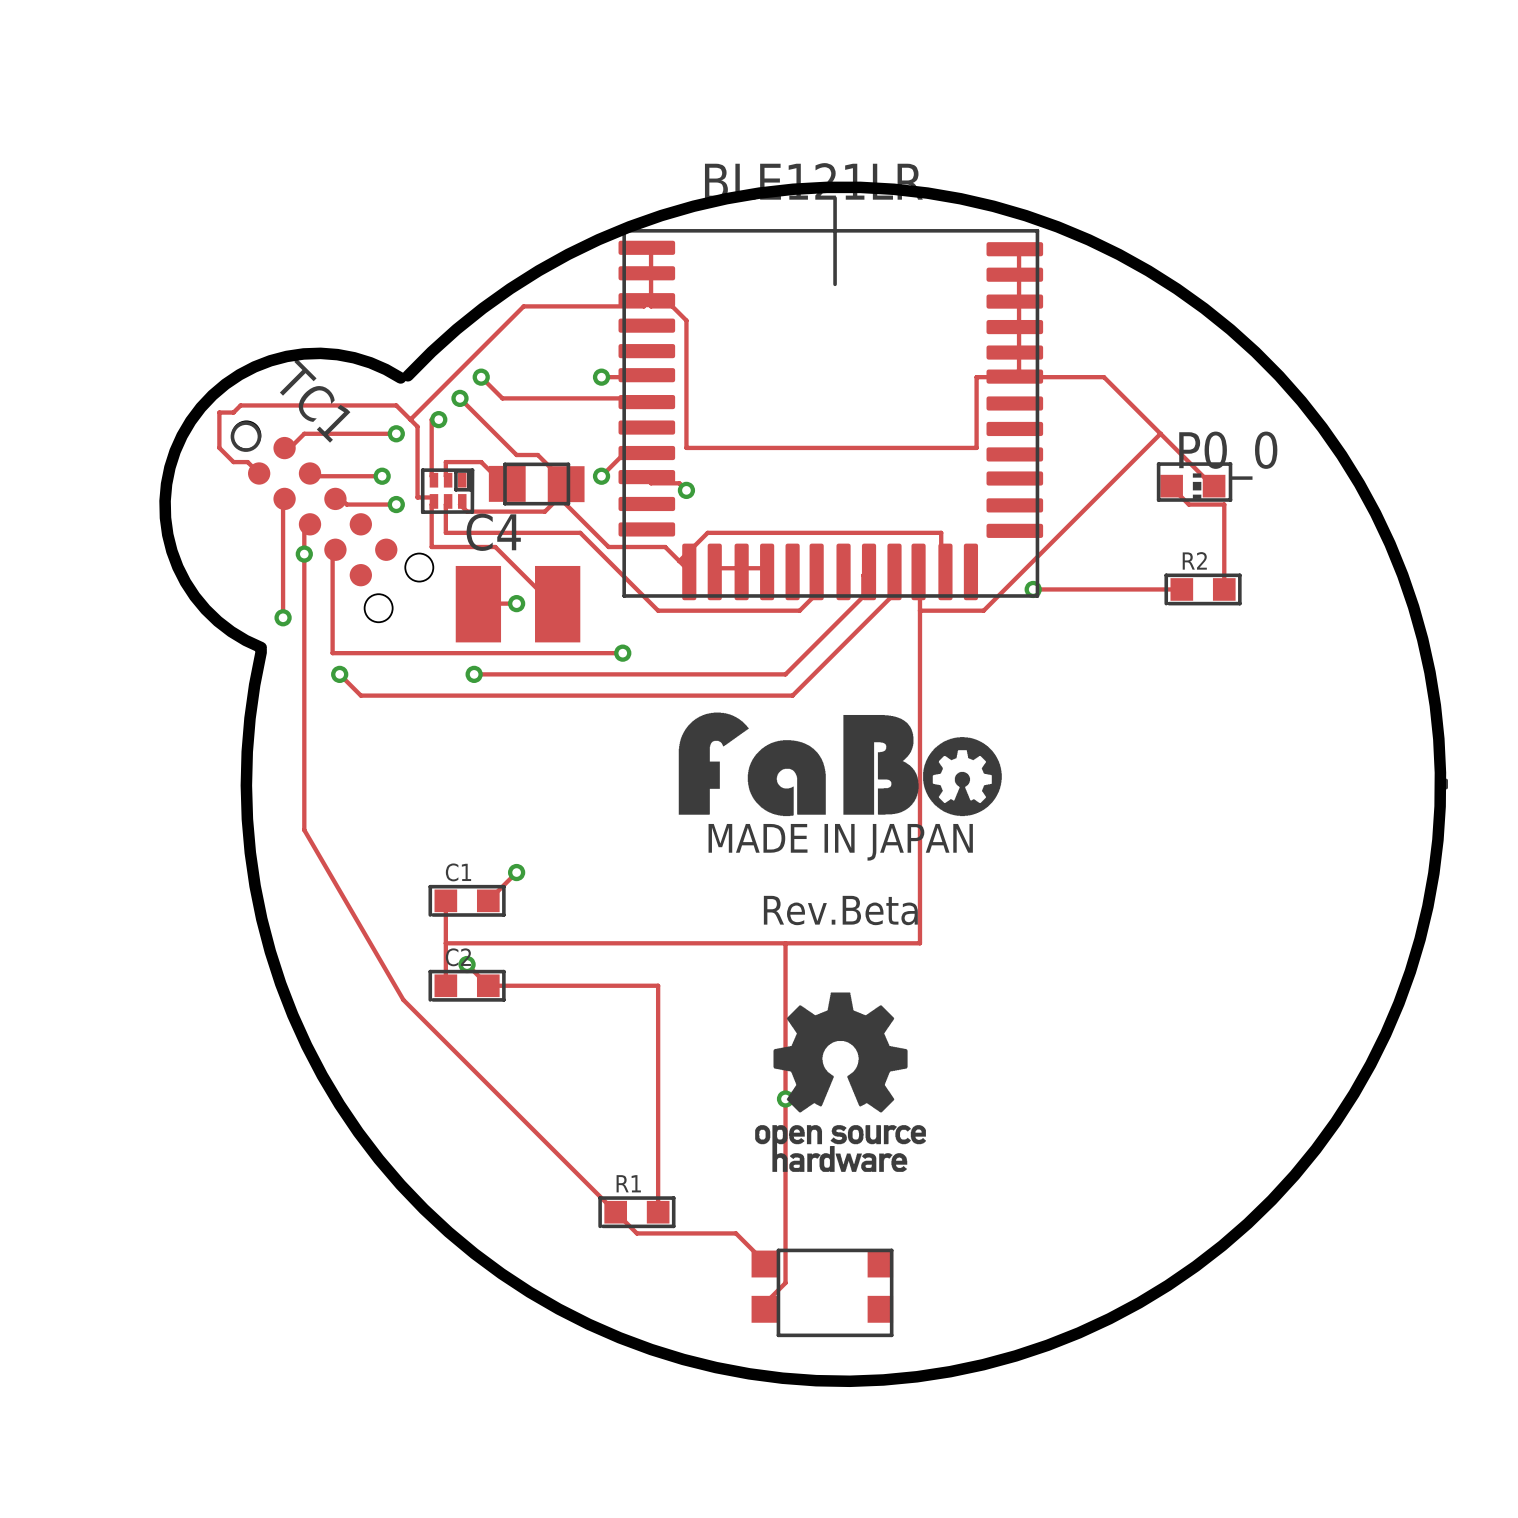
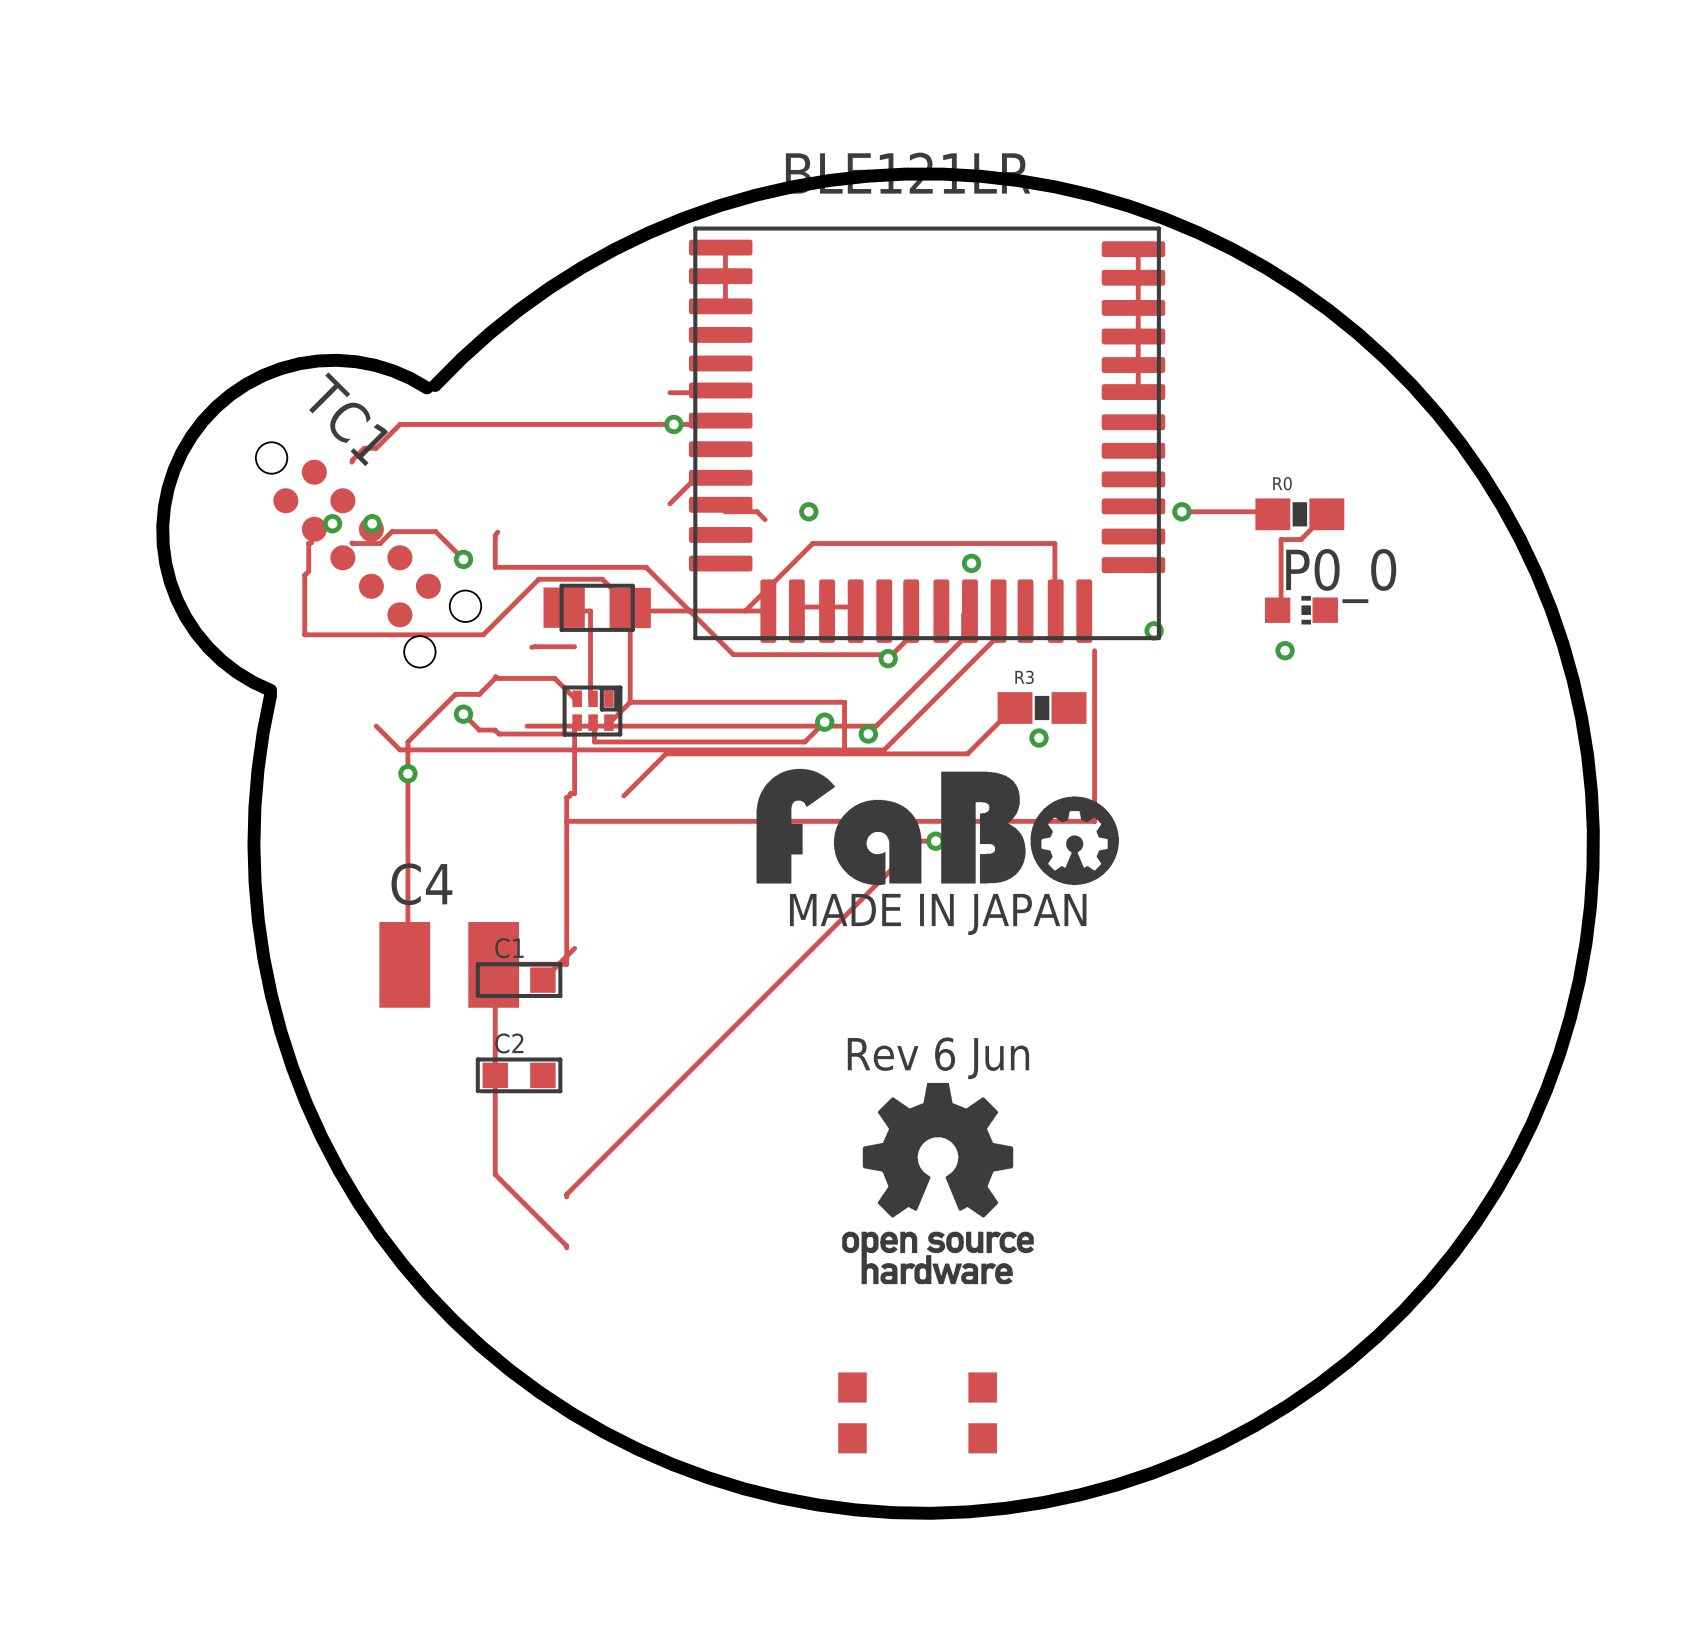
board edge: none -> (435, 385) (489, 333) (519, 309) (581, 267) (614, 249) (683, 218) (719, 205) (792, 186) (829, 180) (867, 176) (942, 174) (1018, 180) (1092, 195) (1163, 218) (1198, 232) (1232, 249) (1297, 288) (1328, 310) (1385, 358) (1437, 414) (1460, 443) (1502, 506) (1536, 574) (1563, 644) (1573, 681) (1587, 755) (1591, 792) (1592, 868) (1585, 943) (1570, 1017) (1559, 1053) (1546, 1089) (1515, 1157) (1476, 1222) (1429, 1282) (1377, 1336) (1348, 1361) (1287, 1405) (1255, 1425) (1187, 1459) (1152, 1472) (1116, 1484) (1043, 1502) (968, 1511) (930, 1513) (893, 1512) (817, 1504) (744, 1488) (672, 1464) (638, 1449) (571, 1413) (509, 1370) (480, 1346) (427, 1292) (379, 1234) (358, 1202) (321, 1136) (292, 1067) (280, 1031) (271, 994) (258, 920) (253, 845) (254, 807) (263, 732) (270, 695)
board edge: none -> (427, 387) (393, 370) (356, 361) (318, 360) (280, 368) (246, 384) (215, 407) (191, 436) (181, 452) (168, 488) (162, 525) (165, 563) (170, 582) (185, 617) (208, 647) (237, 672) (270, 690)
track: (481, 377) (502, 398) (643, 398) (646, 402) -> (439, 424) (717, 424) (720, 420)
via: (481, 377) -> none
via position: (601, 377) -> (673, 424)
track: (459, 398) (516, 455) (537, 455) (566, 483) (566, 490) (544, 511) (467, 511) (459, 504) (462, 501) -> none
via: (459, 398) -> none
track: (360, 405) (240, 405) (233, 412) (219, 412) (219, 447) (233, 462) (247, 462) (259, 473) -> (400, 424) (376, 448) (364, 448) (351, 462)
track: (396, 405) (417, 426) (417, 497) (431, 497) (433, 501) (431, 504) (431, 547) (495, 547) (551, 603) (557, 604) -> none
track: (410, 419) (523, 306) (643, 306) (646, 300) (651, 306) (672, 306) (686, 320) (686, 447) (976, 447) (976, 377) (1103, 377) (1214, 486) -> none
track: (438, 419) (431, 419) (431, 476) (433, 480) -> none
via: (438, 419) -> none
track: (396, 433) (304, 433) (290, 447) (284, 448) -> none
via: (396, 433) -> none
track: (1160, 433) (983, 610) (919, 610) -> none
track: (310, 473) (311, 469) (318, 476) (382, 476) -> none
via: (382, 476) -> none
via: (601, 476) -> none
track: (448, 480) (445, 476) (445, 462) (481, 462) (502, 483) (507, 483) -> none
track: none -> (1181, 511) (1269, 511) (1272, 514)
via: none -> (1181, 511)
part position: (536, 484) -> (597, 607)
track: (566, 484) (559, 497) (608, 547) (665, 547) (689, 571) -> (630, 611) (768, 611)
R0: none -> (1299, 514)
track: none -> (1326, 514) (1300, 539) (1281, 539) (1281, 607) (1277, 610)
track: (1171, 486) (1188, 504) (1224, 504) (1224, 589) -> none
P0_0 position: (1192, 486) -> (1301, 610)
via position: (686, 490) -> (808, 511)
part position: (447, 491) -> (592, 711)
via: none -> (332, 523)
via: none -> (372, 523)
track: (284, 498) (283, 617) -> none
track: (335, 498) (339, 497) (346, 504) (396, 504) -> none
via position: (396, 504) -> (463, 559)
track: none -> (311, 542) (308, 543) (308, 571) (304, 575) (304, 634) (483, 634) (538, 579) (602, 579) (630, 607) (630, 702) (608, 722)
track: none -> (351, 542) (380, 543) (392, 531) (435, 531) (463, 559)
track: (310, 524) (304, 525) (304, 830) (403, 999) (636, 1233) (735, 1233) (764, 1261) (764, 1264) -> none
via: none -> (971, 563)
track: (707, 532) (941, 532) (941, 568) (945, 571) -> (788, 567) (812, 543) (1054, 543) (1055, 611)
track: (335, 549) (332, 554) (332, 653) (566, 653) -> none
via: (304, 554) -> none
track: none -> (757, 599) (745, 611)
track: none -> (564, 607) (566, 611) (590, 611) (590, 698) (593, 698)
track: (1033, 589) (1181, 589) -> none
R2: (1203, 589) -> none
track: (919, 593) (919, 943) (445, 943) -> none
via: (516, 603) -> none
C4 position: (518, 604) -> (449, 964)
track: none -> (1094, 650) (1094, 821) (566, 821)
via: none -> (1285, 650)
via: none -> (888, 658)
via: (283, 617) -> none
track: none -> (577, 698) (554, 678) (495, 676) (479, 694) (455, 694) (407, 741) (407, 964) (404, 964)
track: none -> (693, 702) (844, 702) (844, 753)
via: (622, 653) -> none
track: none -> (1015, 708) (967, 753) (665, 753) (623, 795)
R3: none -> (1042, 708)
track: none -> (463, 714) (479, 730) (495, 730) (499, 734) (574, 734)
via: none -> (463, 714)
track: none -> (824, 722) (804, 741) (594, 741) (593, 722)
via: none -> (824, 722)
track: none -> (577, 722) (574, 726) (574, 793) (570, 793) (566, 797) (566, 964) (495, 964) (493, 964) (495, 980)
via: (339, 674) -> none
via: (474, 674) -> none
via: none -> (868, 734)
via: none -> (1039, 738)
via: none -> (407, 773)
track: none -> (935, 841) (919, 841) (566, 1194) (566, 1196)
via: none -> (935, 841)
part: (803, 784) -> none
via: (516, 872) -> none
text: Rev.Beta (840, 910) -> none
track: (785, 943) (785, 1282) (764, 1304) (764, 1309) -> none
track: (467, 964) (488, 985) (658, 985) (658, 1212) -> none
via: (467, 964) -> none
text: none -> Rev 6 Jun (938, 1058)
track: none -> (495, 1075) (495, 1174) (566, 1247)
via: (785, 1098) -> none
R1: (636, 1212) -> none

